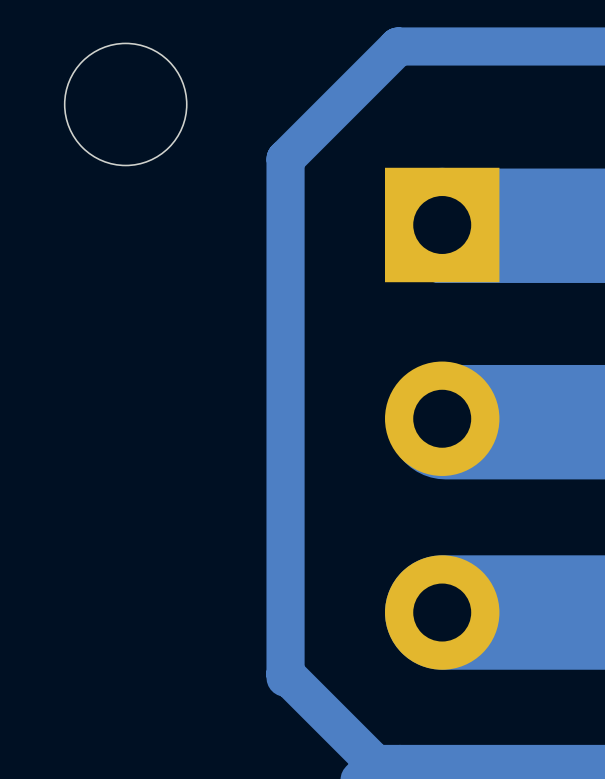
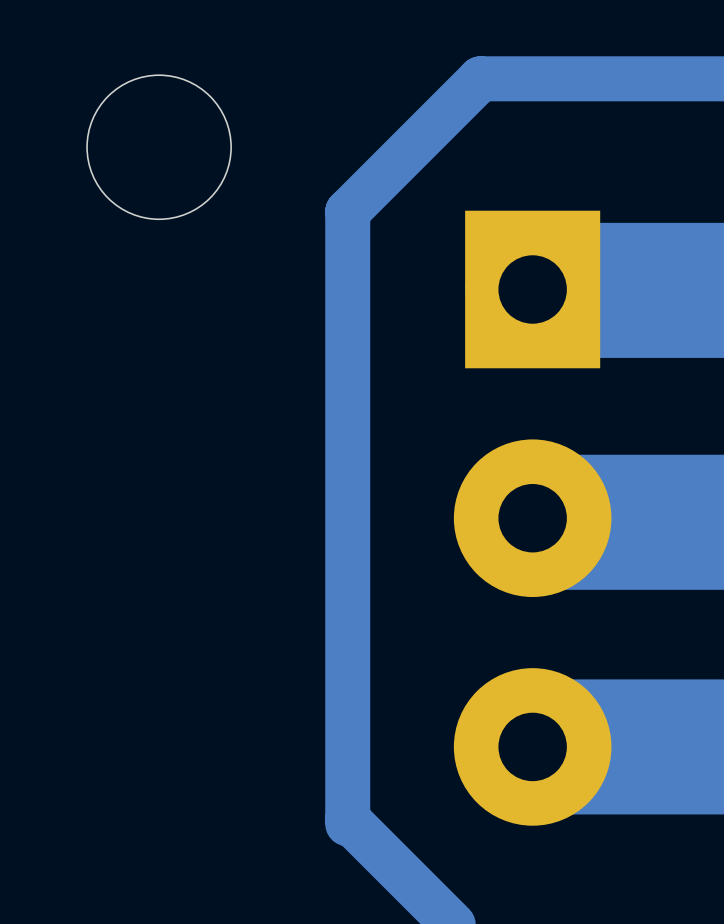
part footprint: [385, 167, 500, 670] -> [453, 210, 612, 826]

